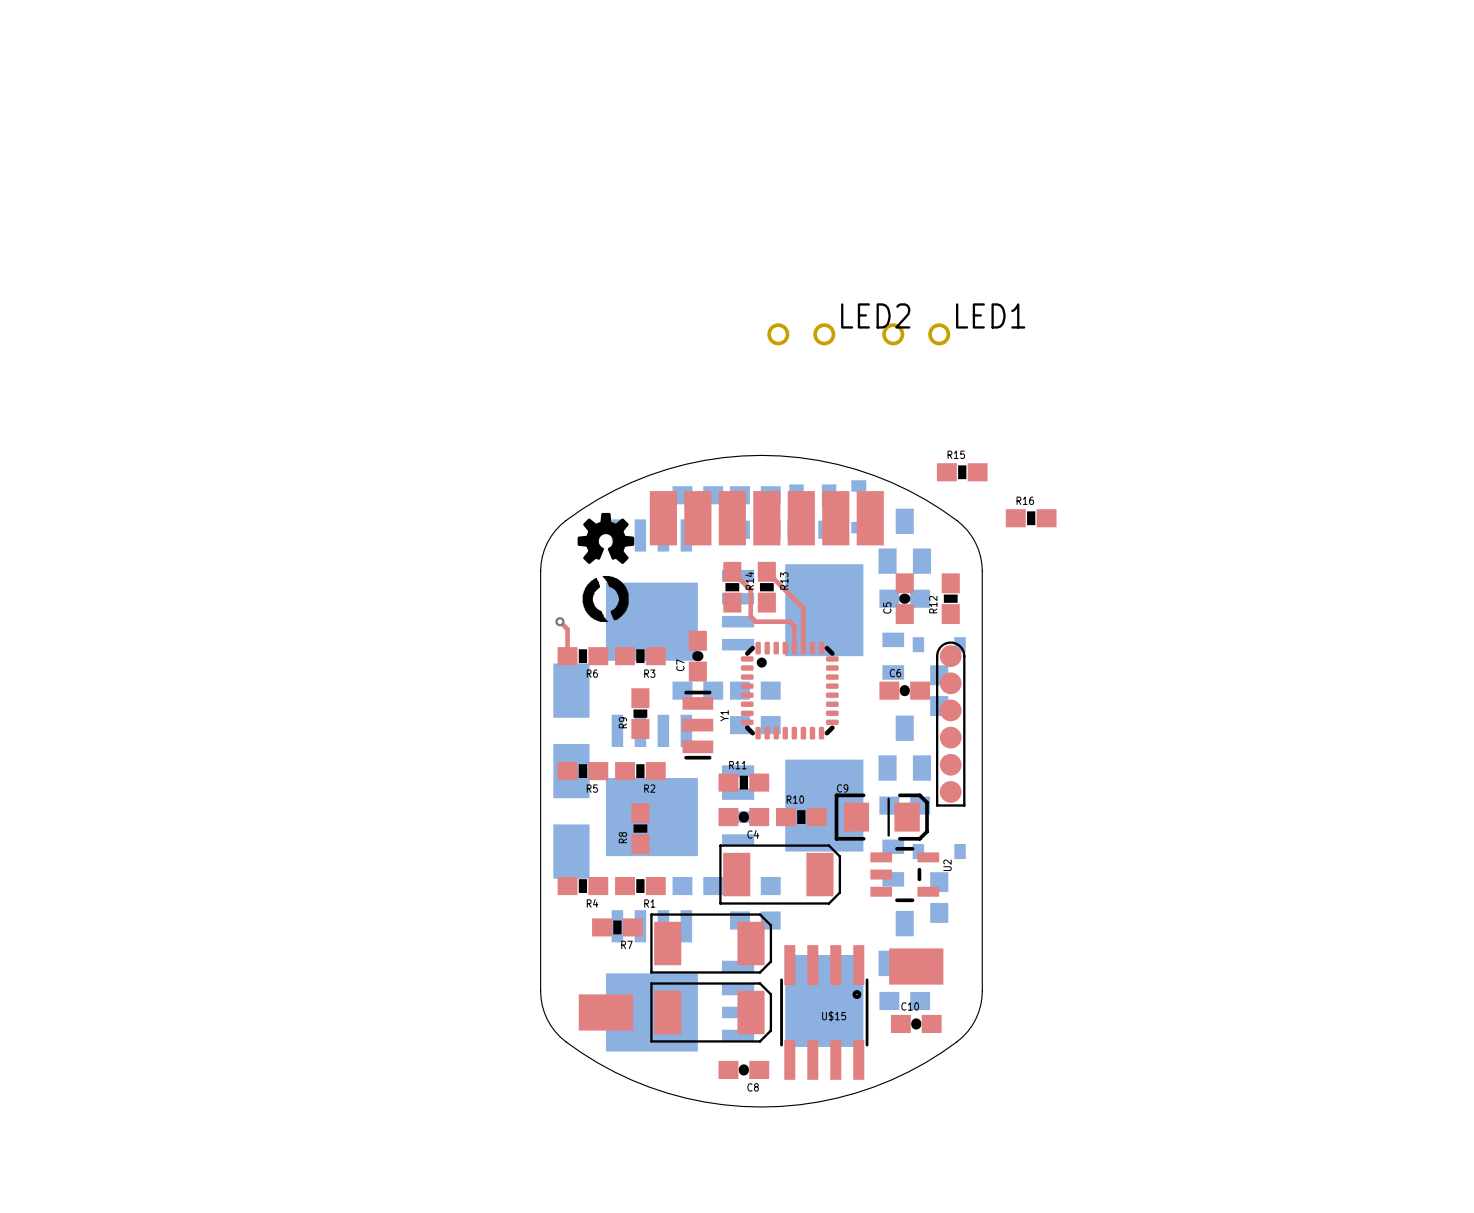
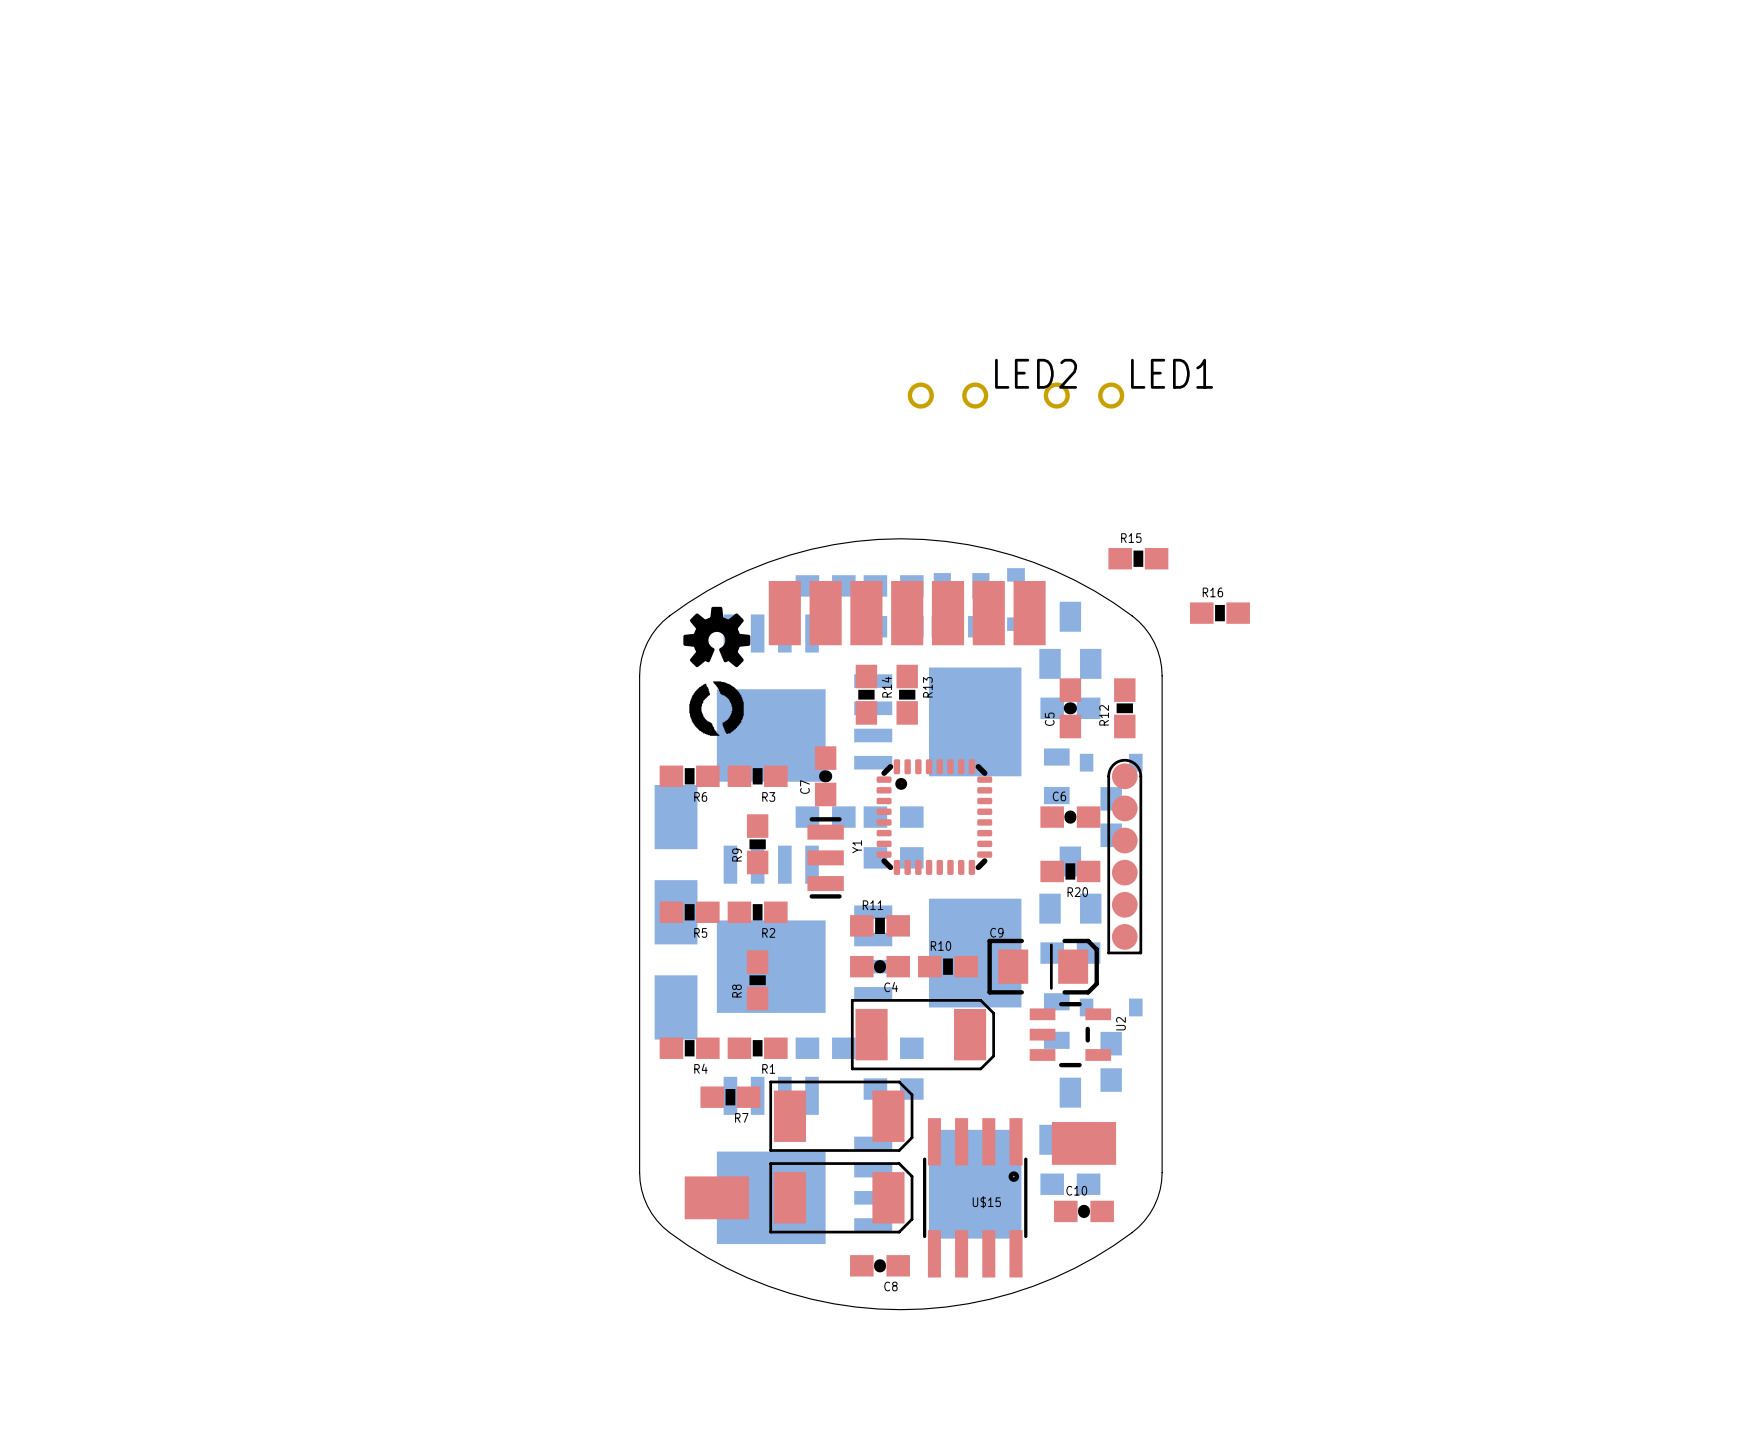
top track: (732, 571) (750, 590) (750, 616) (755, 621) (789, 621) (794, 626) (794, 648) -> none
top track: (766, 571) (803, 608) (803, 648) -> none
top track: (559, 621) (567, 629) (567, 656) -> none
via: (559, 621) -> none
R20: none -> (1070, 871)

